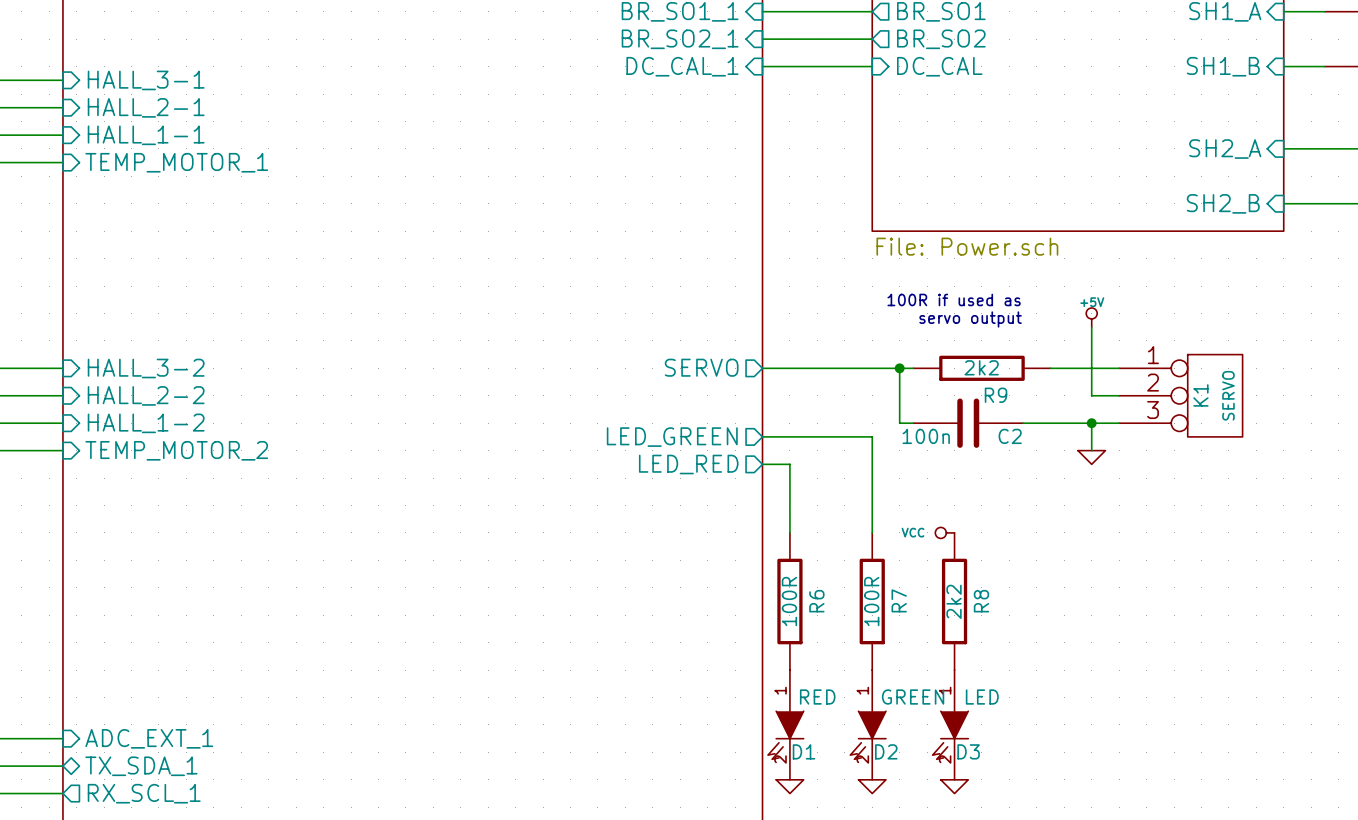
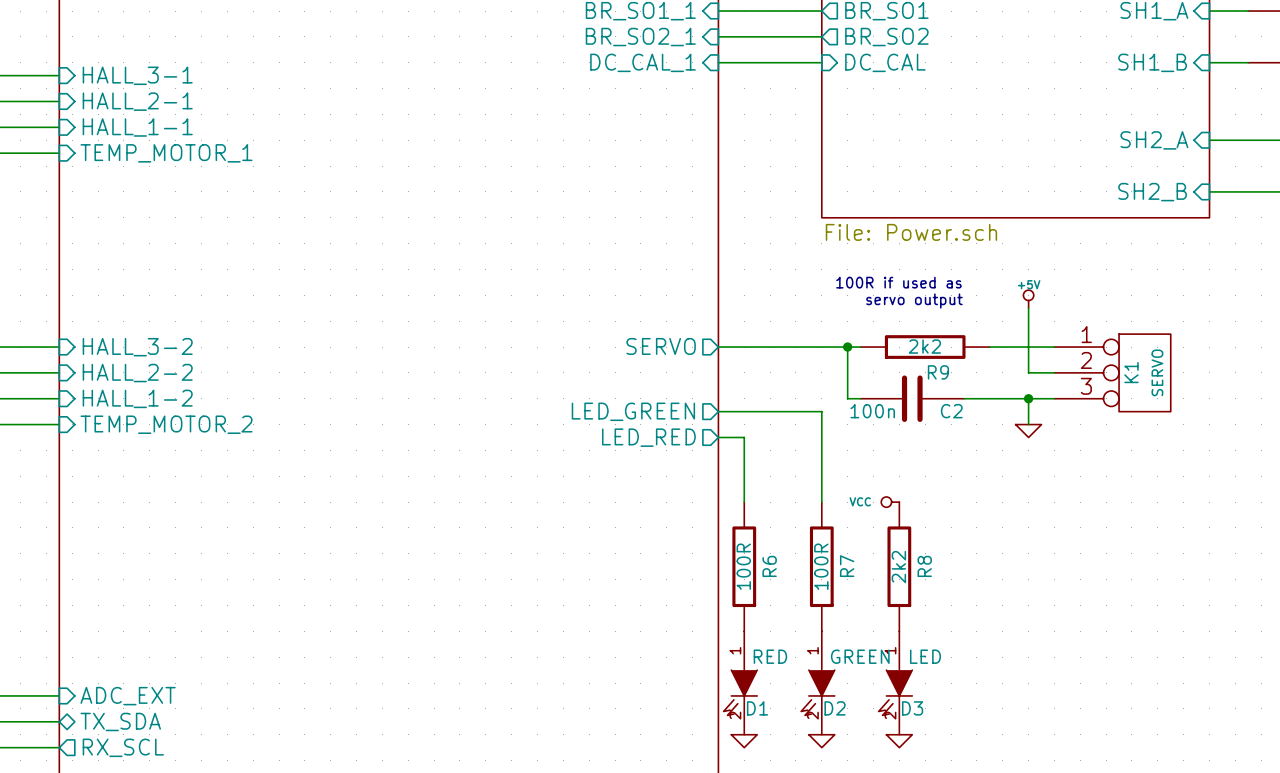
sheet pin: ADC_EXT_1 (149, 738) -> ADC_EXT (128, 696)
sheet pin: TX_SDA_1 (141, 766) -> TX_SDA (120, 721)
sheet pin: RX_SCL_1 (144, 793) -> RX_SCL (123, 747)

